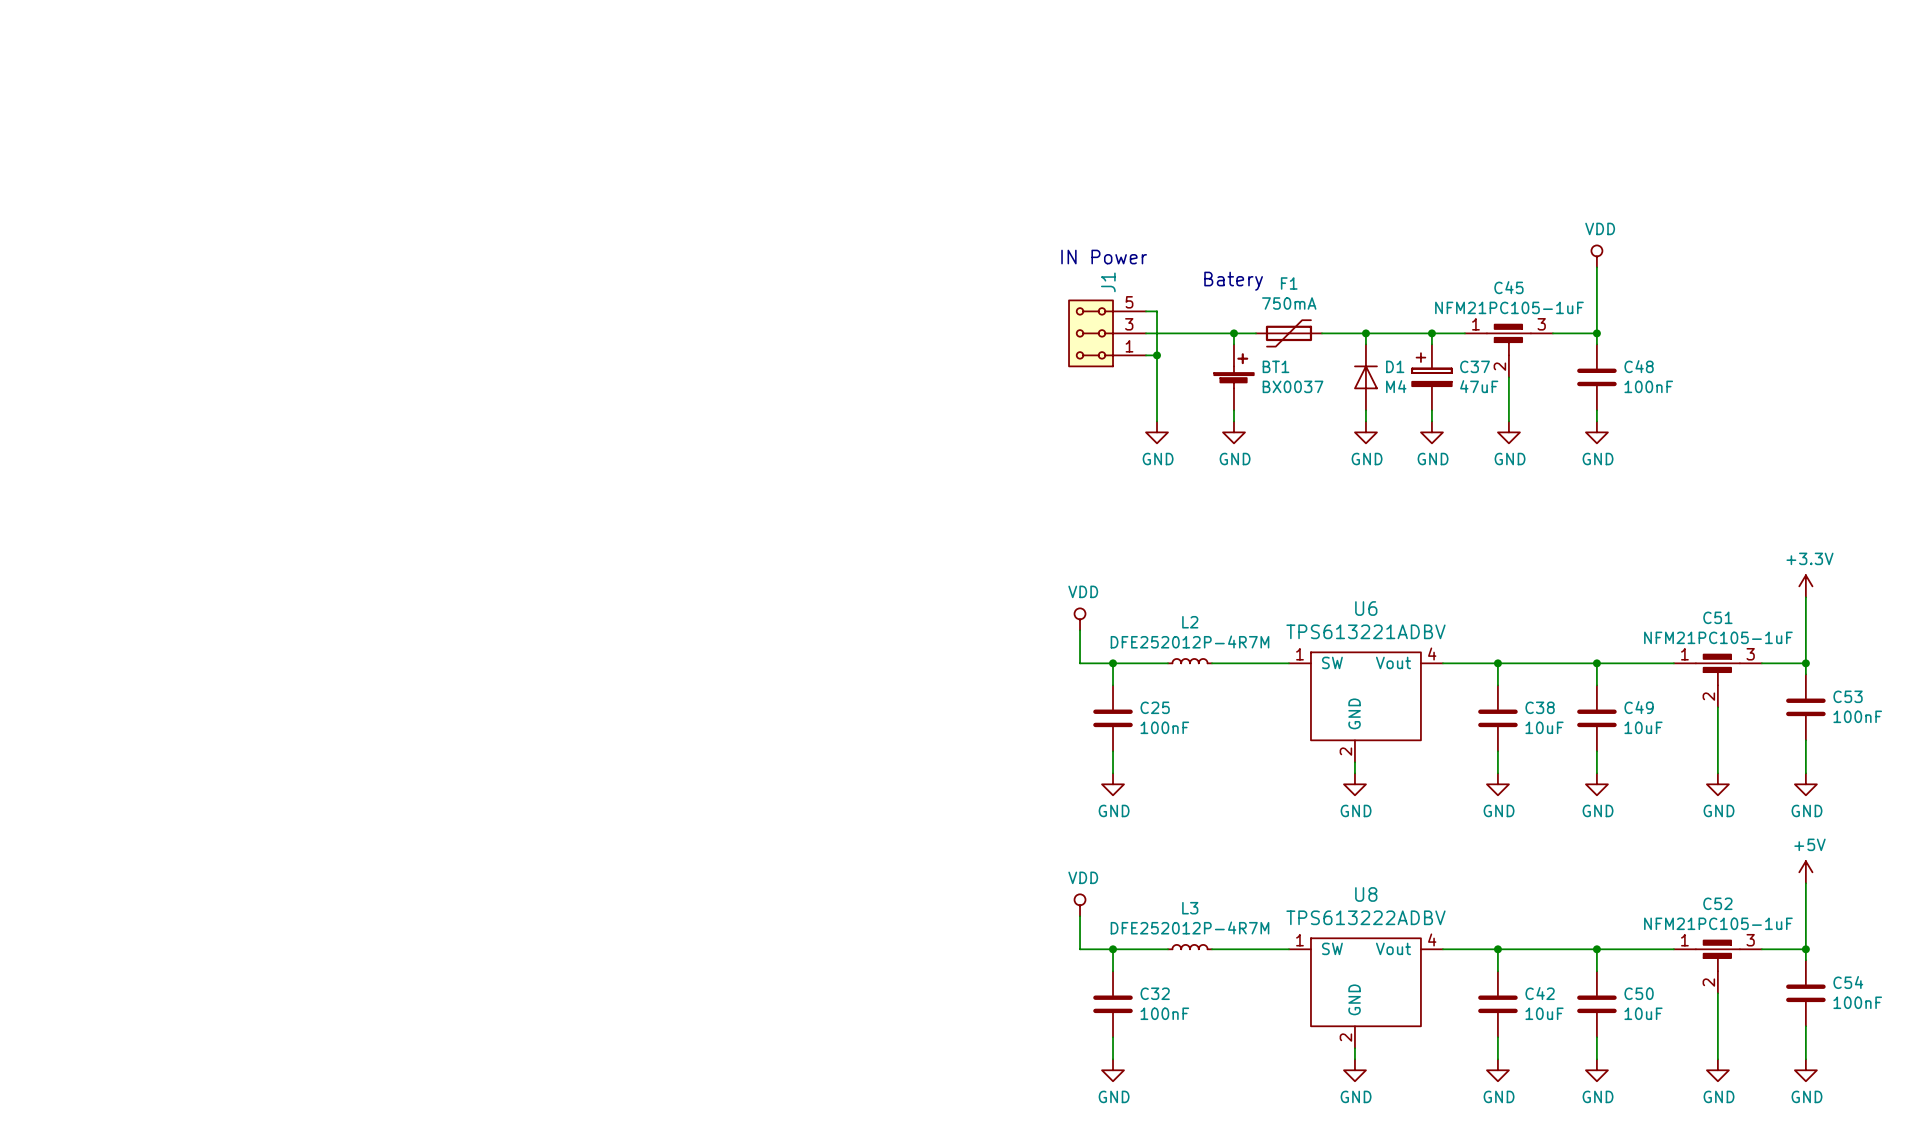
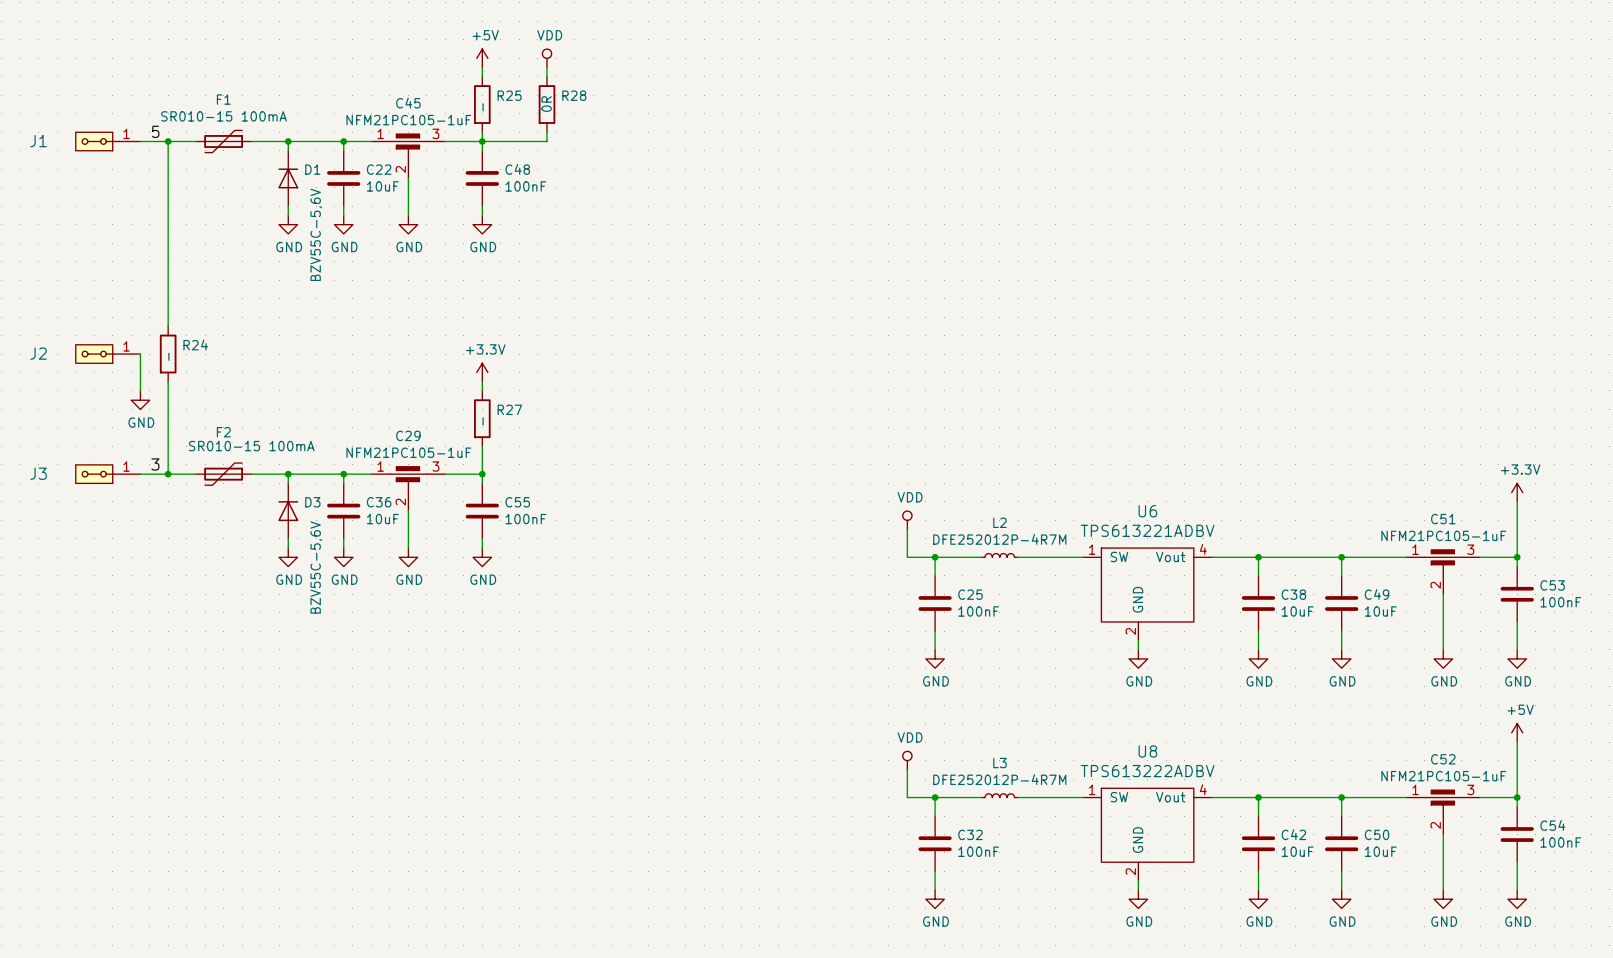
power symbol: none -> +5V (482, 58)
power symbol: none -> VDD (547, 58)
wire: none -> (482, 67) (482, 76)
wire: none -> (547, 67) (547, 76)
R25: none -> - (482, 104)
R28: none -> 0R (547, 104)
label: none -> 5 (155, 131)
wire: none -> (482, 132) (482, 150)
wire: none -> (547, 132) (547, 141) (445, 141)
wire: none -> (140, 141) (195, 141)
wire: none -> (168, 141) (168, 326)
junction: none -> (168, 141)
wire: none -> (251, 141) (371, 141)
wire: none -> (288, 141) (288, 150)
junction: none -> (288, 141)
wire: none -> (343, 141) (343, 150)
junction: none -> (343, 141)
junction: none -> (482, 141)
C22: none -> 10uF (343, 178)
wire: none -> (408, 178) (408, 215)
wire: none -> (288, 206) (288, 215)
wire: none -> (343, 206) (343, 215)
wire: none -> (482, 206) (482, 215)
power symbol: VDD (1596, 256) -> none
text: IN Power (1104, 257) -> none
power symbol: none -> GND (288, 224)
power symbol: none -> GND (343, 224)
power symbol: none -> GND (408, 224)
power symbol: none -> GND (482, 224)
wire: (1596, 267) (1596, 344) -> none
text: Batery (1233, 281) -> none
J1 name position: J1 (1108, 282) -> J1 (38, 141)
J1 symbol: [1069, 300, 1147, 367] -> [75, 132, 141, 151]
F1 value: 750mA (1289, 303) -> SR010-15 100mA (224, 116)
wire: (1146, 311) (1157, 311) (1157, 421) -> none
wire: (1146, 333) (1255, 333) -> none
wire: (1233, 333) (1233, 344) -> none
junction: (1233, 333) -> none
F1 position: (1288, 333) -> (223, 141)
wire: (1321, 333) (1464, 333) -> none
wire: (1365, 333) (1365, 344) -> none
junction: (1365, 333) -> none
wire: (1431, 333) (1431, 344) -> none
junction: (1431, 333) -> none
wire: (1552, 333) (1596, 333) -> none
junction: (1596, 333) -> none
C45 position: (1508, 350) -> (408, 156)
wire: (1146, 355) (1157, 355) -> none
junction: (1157, 355) -> none
BT1: BX0037 (1233, 377) -> none
D1 position: (1365, 377) -> (288, 178)
C37: 47uF (1431, 377) -> none
wire: (1508, 377) (1508, 421) -> none
C48 position: (1596, 377) -> (482, 178)
D1 value: M4 (1396, 386) -> BZV55C-5,6V (316, 234)
wire: (1233, 410) (1233, 421) -> none
wire: (1365, 410) (1365, 421) -> none
wire: (1431, 410) (1431, 421) -> none
wire: (1596, 410) (1596, 421) -> none
J2: none -> (108, 354)
wire: none -> (140, 354) (140, 390)
R24: none -> - (168, 354)
power symbol: GND (1157, 432) -> none
power symbol: GND (1233, 432) -> none
power symbol: GND (1365, 432) -> none
power symbol: GND (1431, 432) -> none
power symbol: GND (1508, 432) -> none
power symbol: GND (1596, 432) -> none
power symbol: none -> +3.3V (482, 372)
wire: none -> (168, 381) (168, 474)
wire: none -> (482, 381) (482, 390)
power symbol: none -> GND (140, 400)
R27: none -> - (482, 418)
wire: none -> (482, 446) (482, 483)
label: none -> 3 (155, 464)
J3: none -> (108, 474)
wire: none -> (140, 474) (195, 474)
junction: none -> (168, 474)
F2: none -> SR010-15 100mA (223, 474)
wire: none -> (251, 474) (371, 474)
wire: none -> (288, 474) (288, 483)
junction: none -> (288, 474)
wire: none -> (343, 474) (343, 483)
junction: none -> (343, 474)
wire: none -> (445, 474) (482, 474)
junction: none -> (482, 474)
C29: none -> NFM21PC105-1uF (408, 488)
D3: none -> BZV55C-5,6V (288, 511)
C36: none -> 10uF (343, 511)
wire: none -> (408, 511) (408, 548)
C55: none -> 100nF (482, 511)
wire: none -> (288, 538) (288, 548)
wire: none -> (343, 538) (343, 548)
wire: none -> (482, 538) (482, 548)
power symbol: none -> GND (288, 557)
power symbol: none -> GND (343, 557)
power symbol: none -> GND (408, 557)
power symbol: none -> GND (482, 557)

